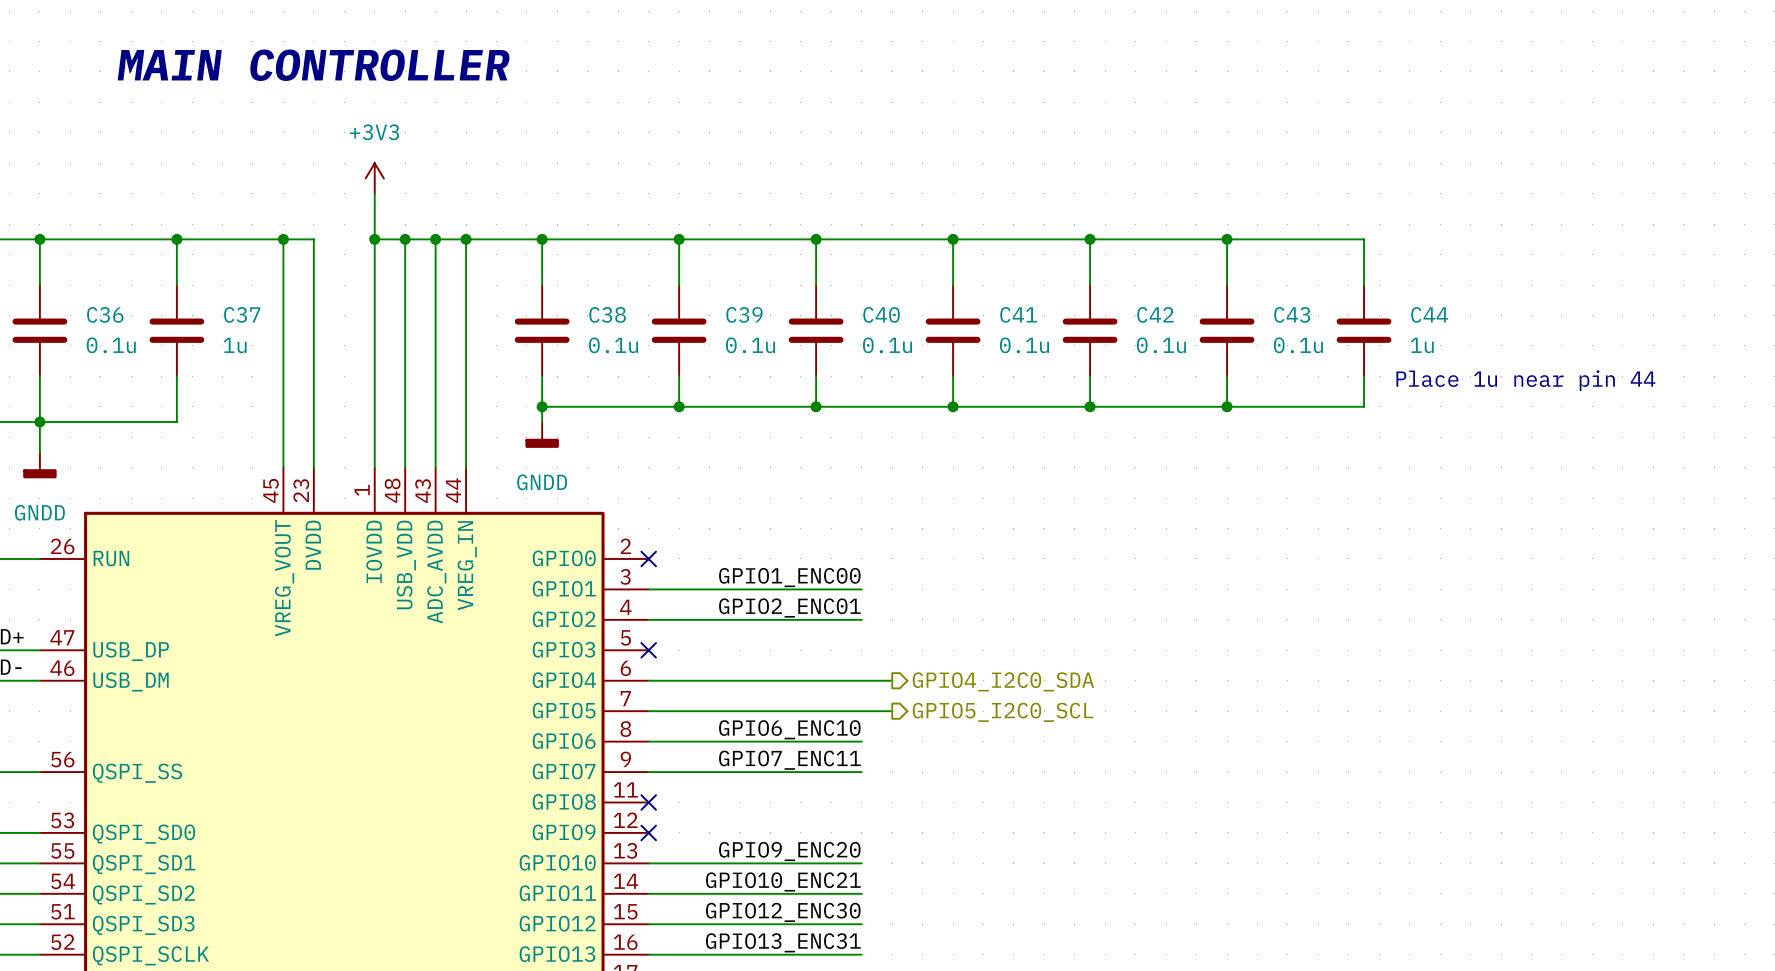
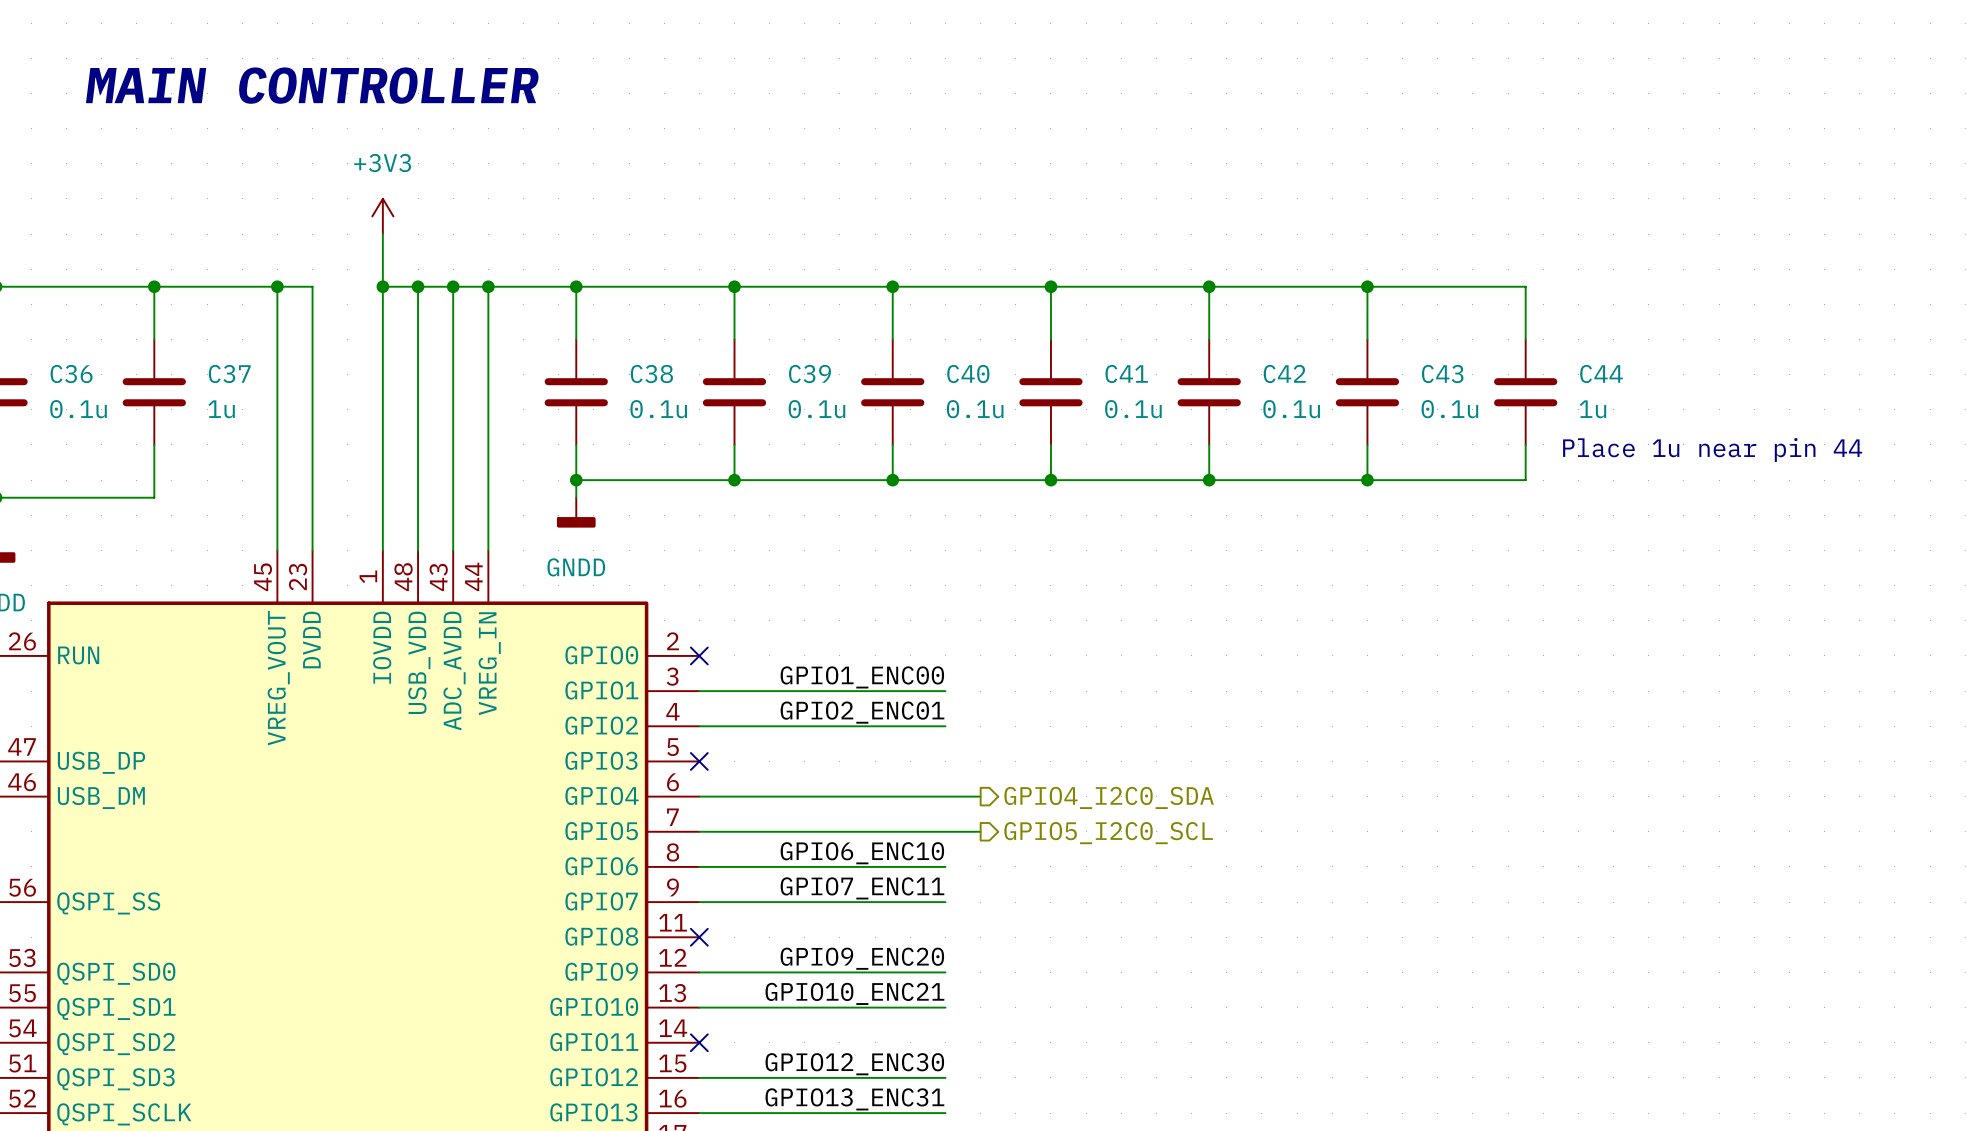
label: none -> GPIO9_ENC20 (862, 958)
no-connect mark position: (648, 832) -> (699, 1042)
label: GPIO9_ENC20 (789, 851) -> GPIO10_ENC21 (854, 993)
label: GPIO10_ENC21 (783, 881) -> none
wire: (648, 893) (861, 893) -> (699, 972) (945, 972)

